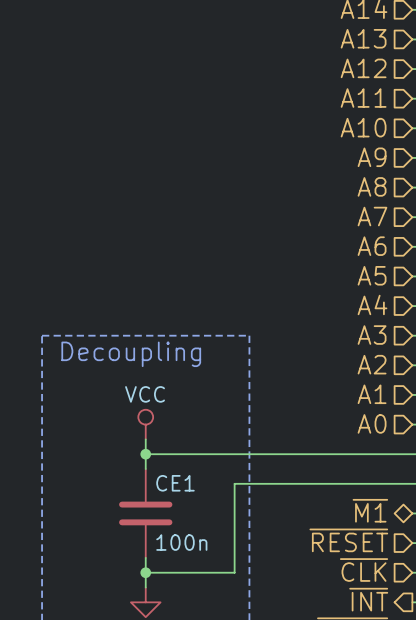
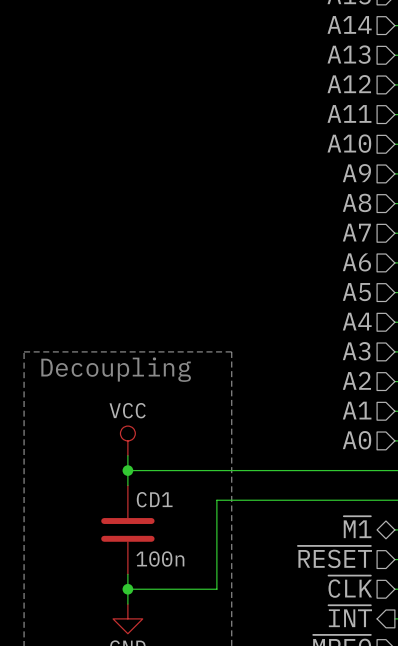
CE1 name: CE1 (175, 483) -> CD1 (154, 499)

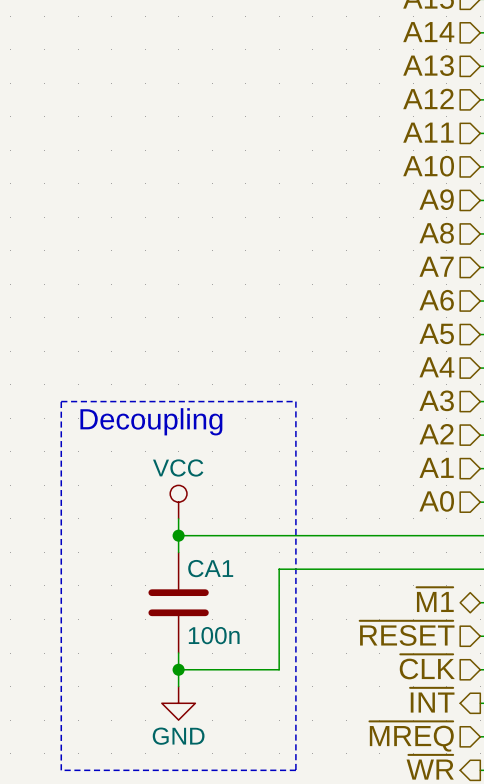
CD1 name: CD1 (154, 499) -> CA1 (210, 568)

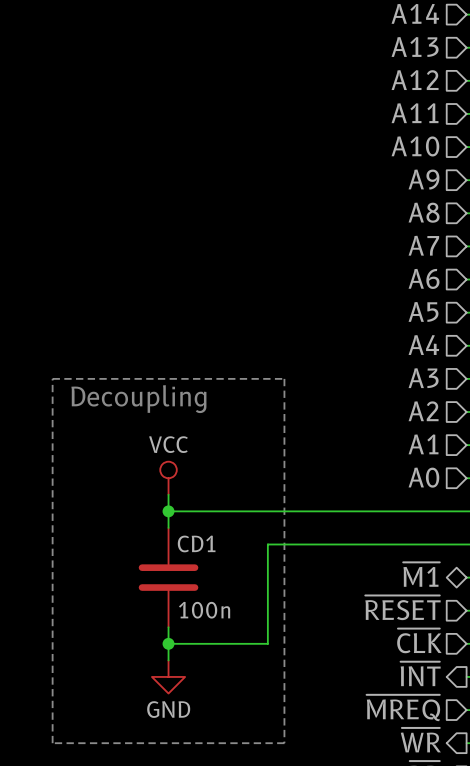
CA1 name: CA1 (210, 568) -> CD1 (196, 543)

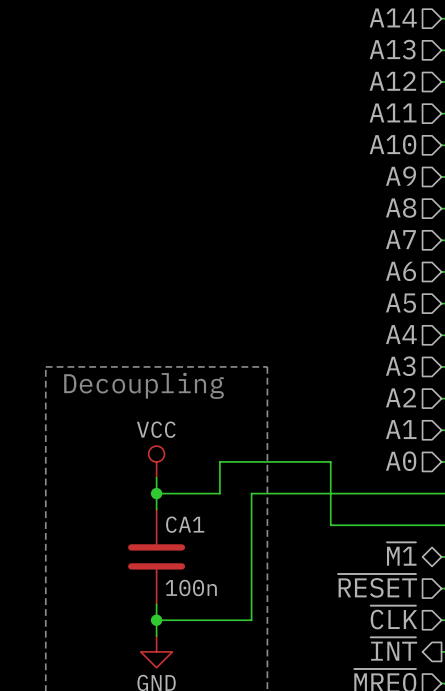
wire: (234, 511) (267, 511) -> (251, 525) (251, 493)
CD1 name: CD1 (196, 543) -> CA1 (185, 524)
wire: (267, 544) (350, 544) -> (219, 493) (219, 461) (330, 461) (330, 525)

